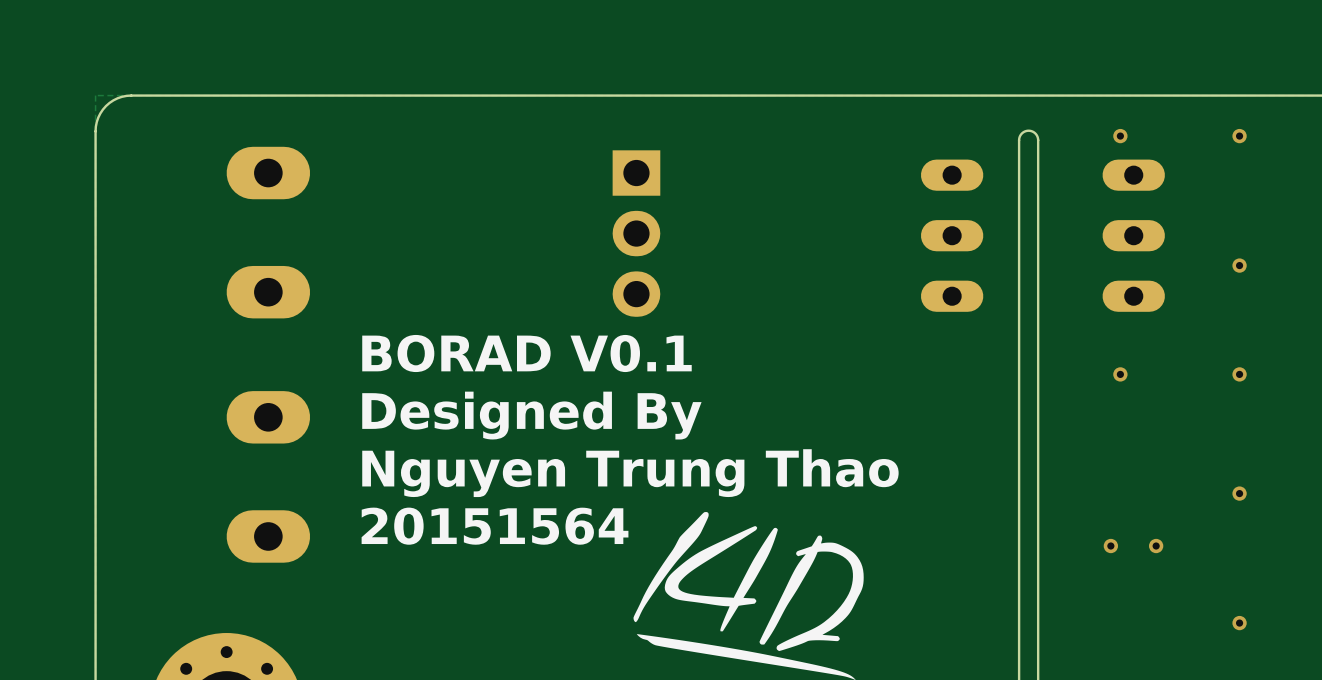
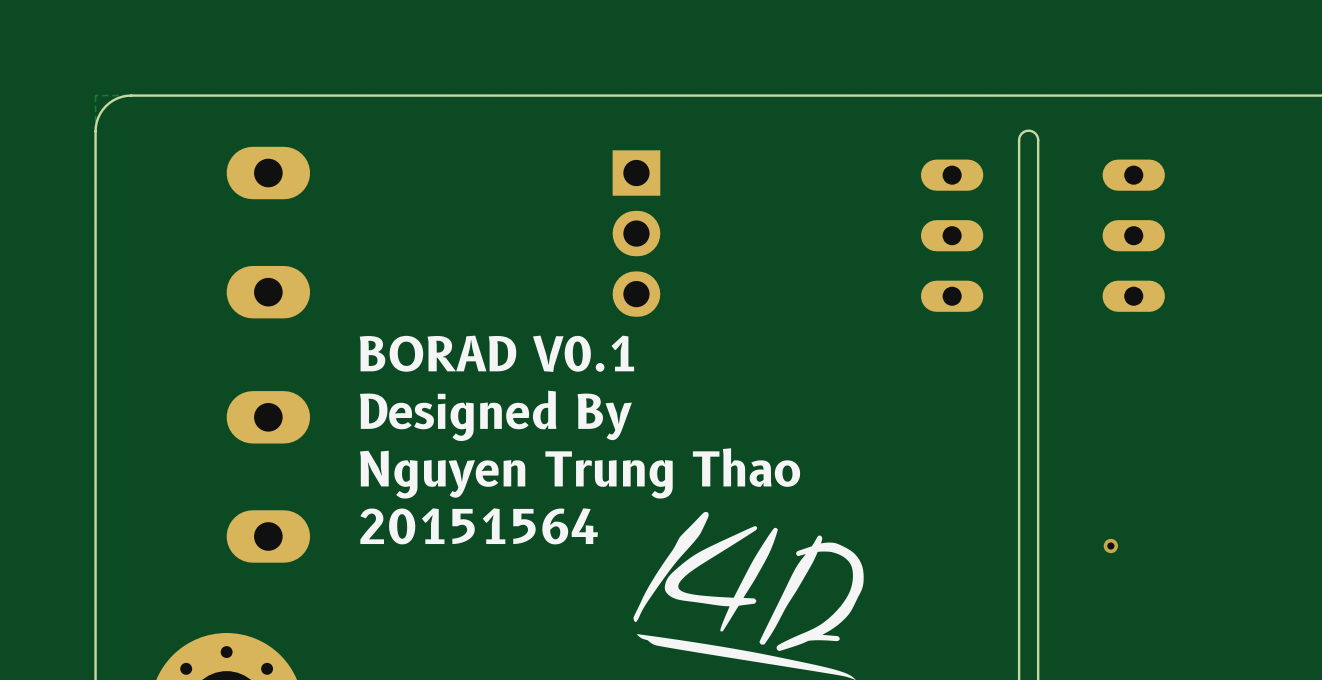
via: (1120, 136) -> none
via: (1239, 136) -> none
via: (1239, 265) -> none
via: (1120, 374) -> none
via: (1239, 374) -> none
via: (1239, 493) -> none
via: (1156, 546) -> none
via: (1239, 623) -> none

